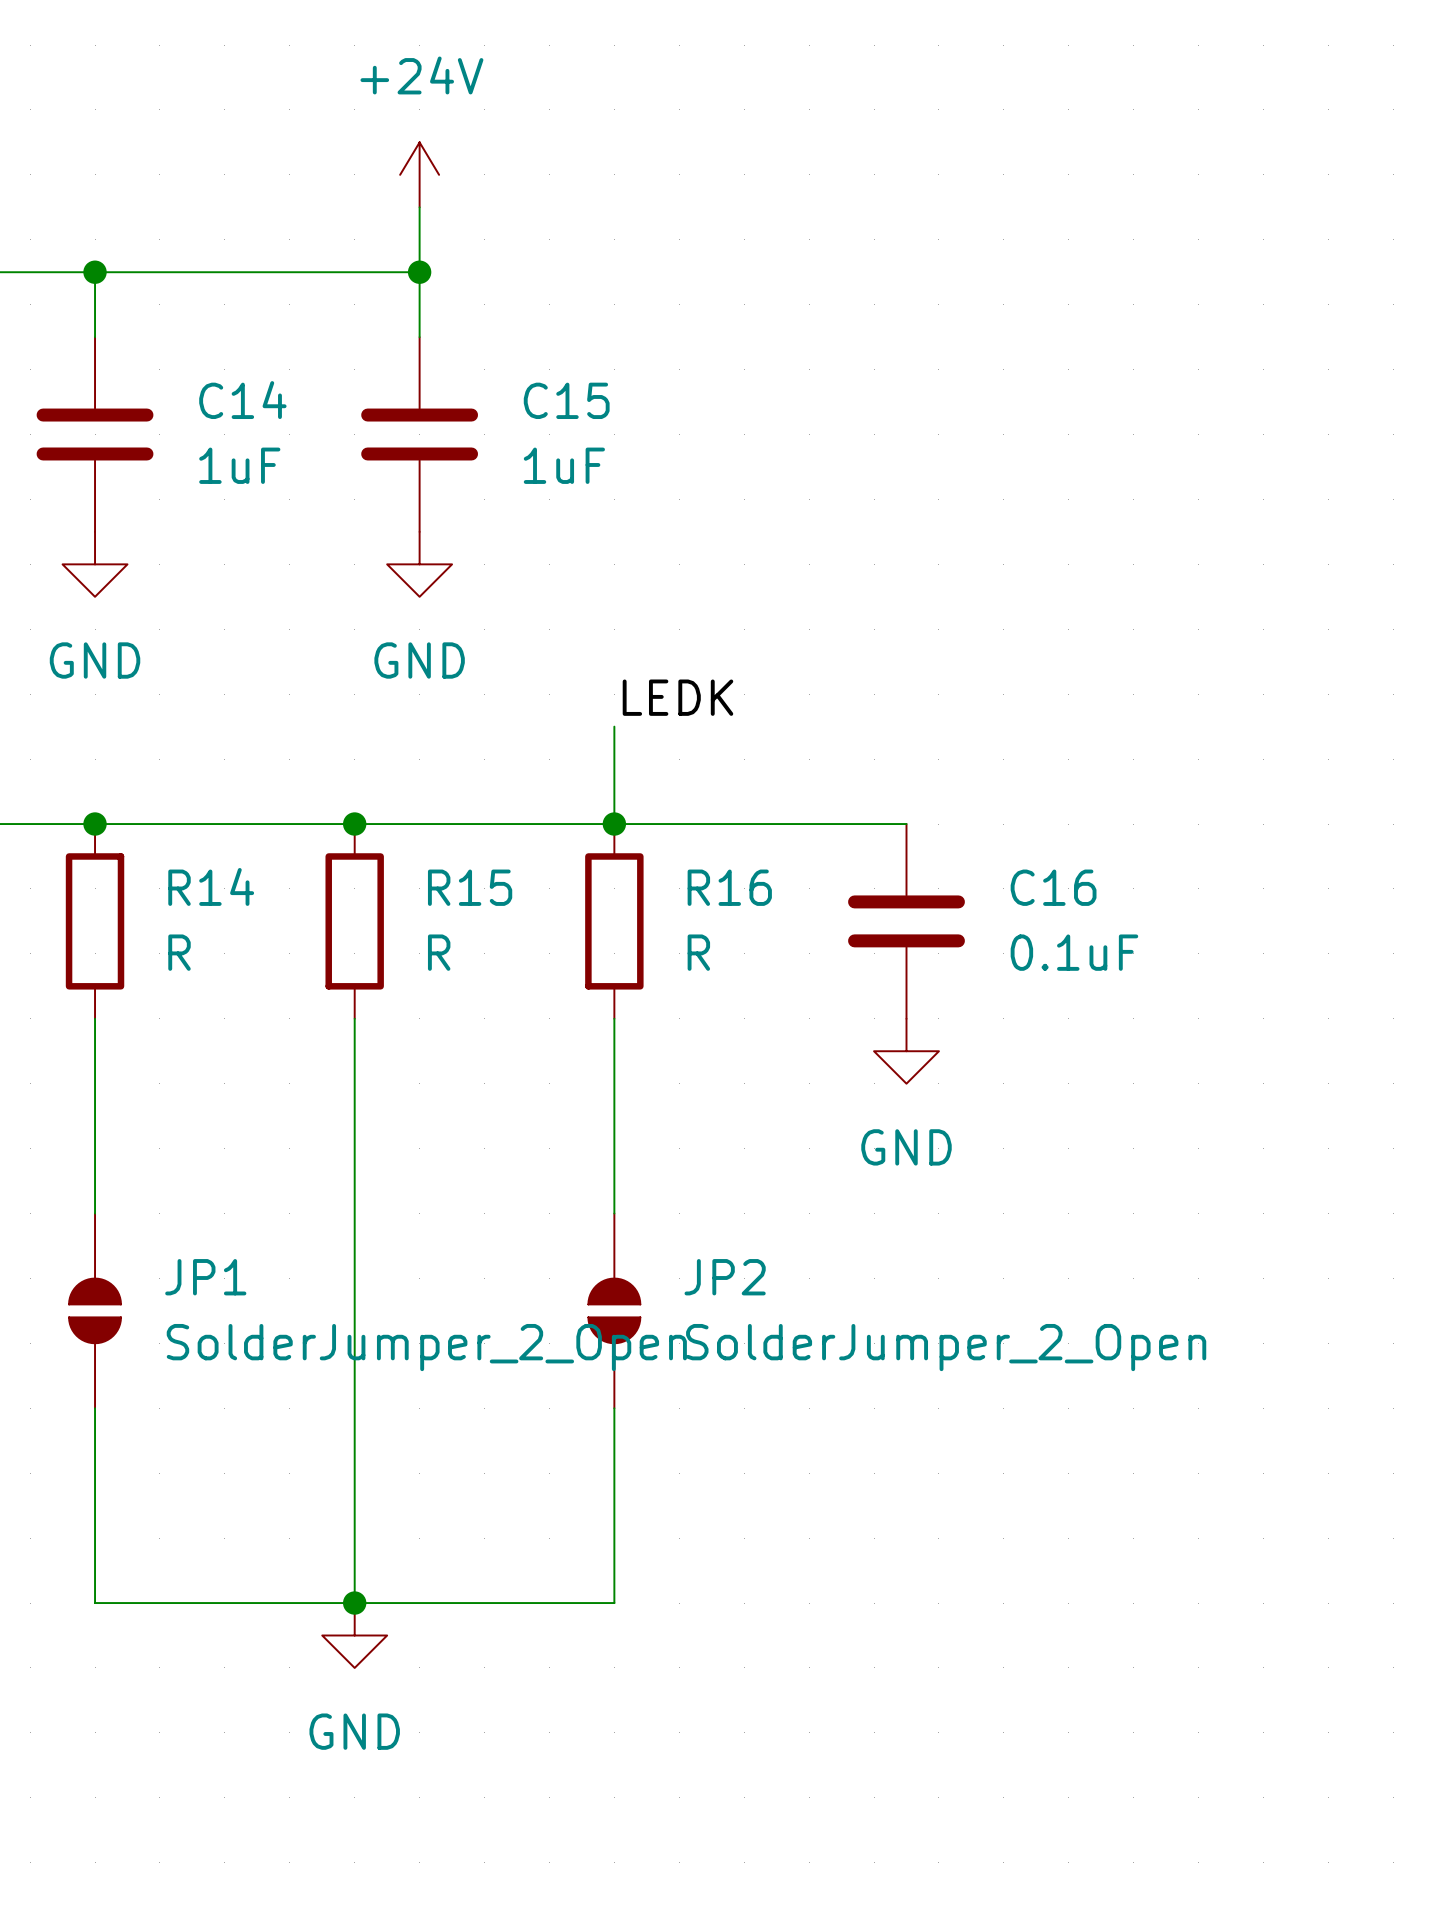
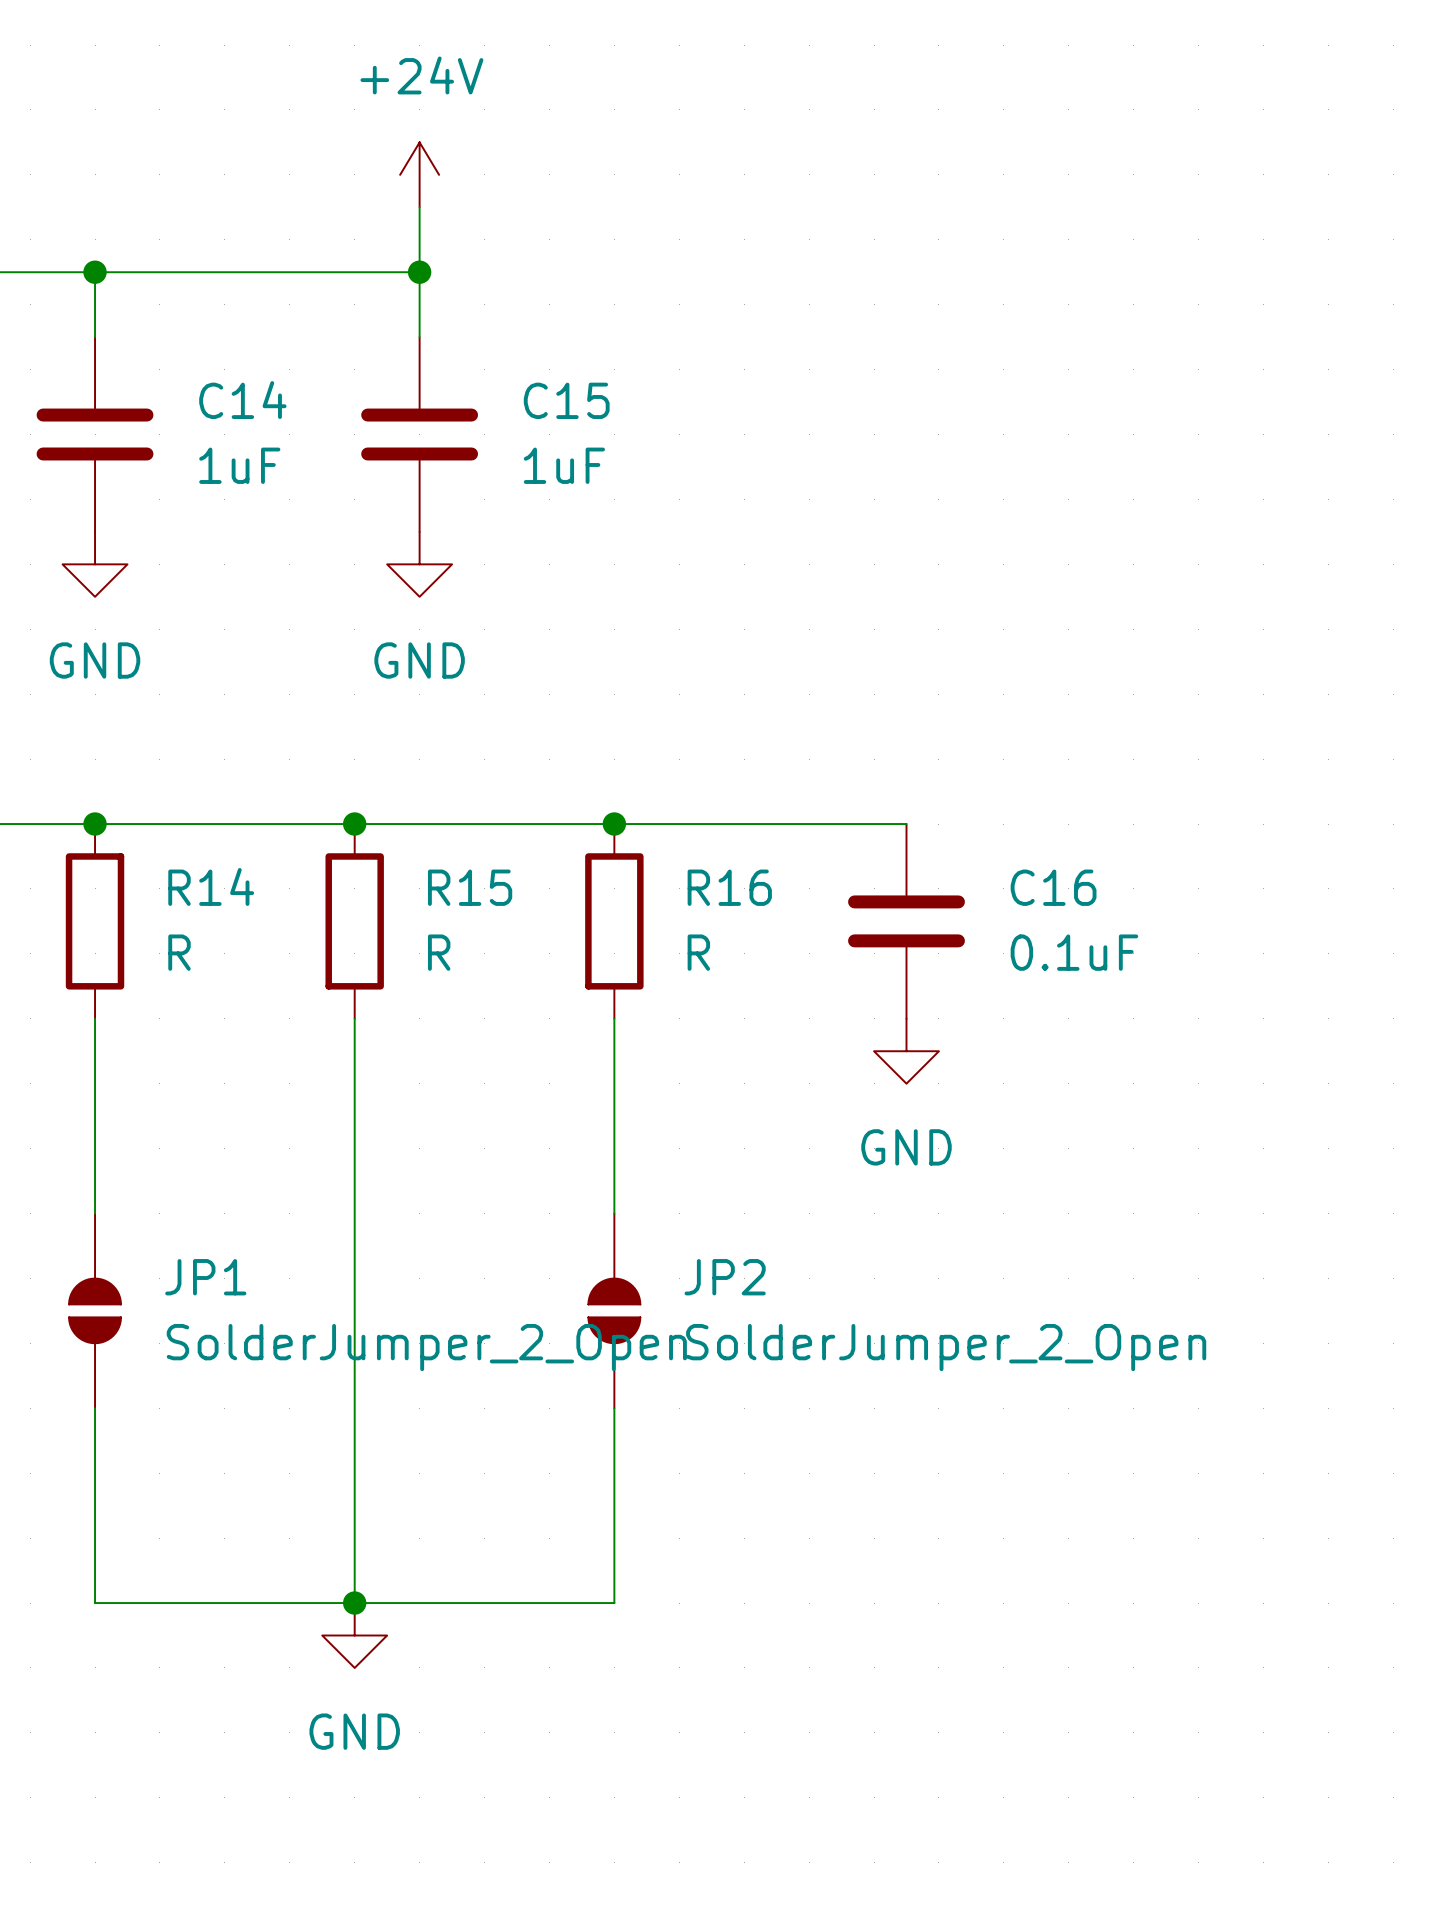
label: LEDK (677, 697) -> none
wire: (614, 726) (614, 824) -> none

